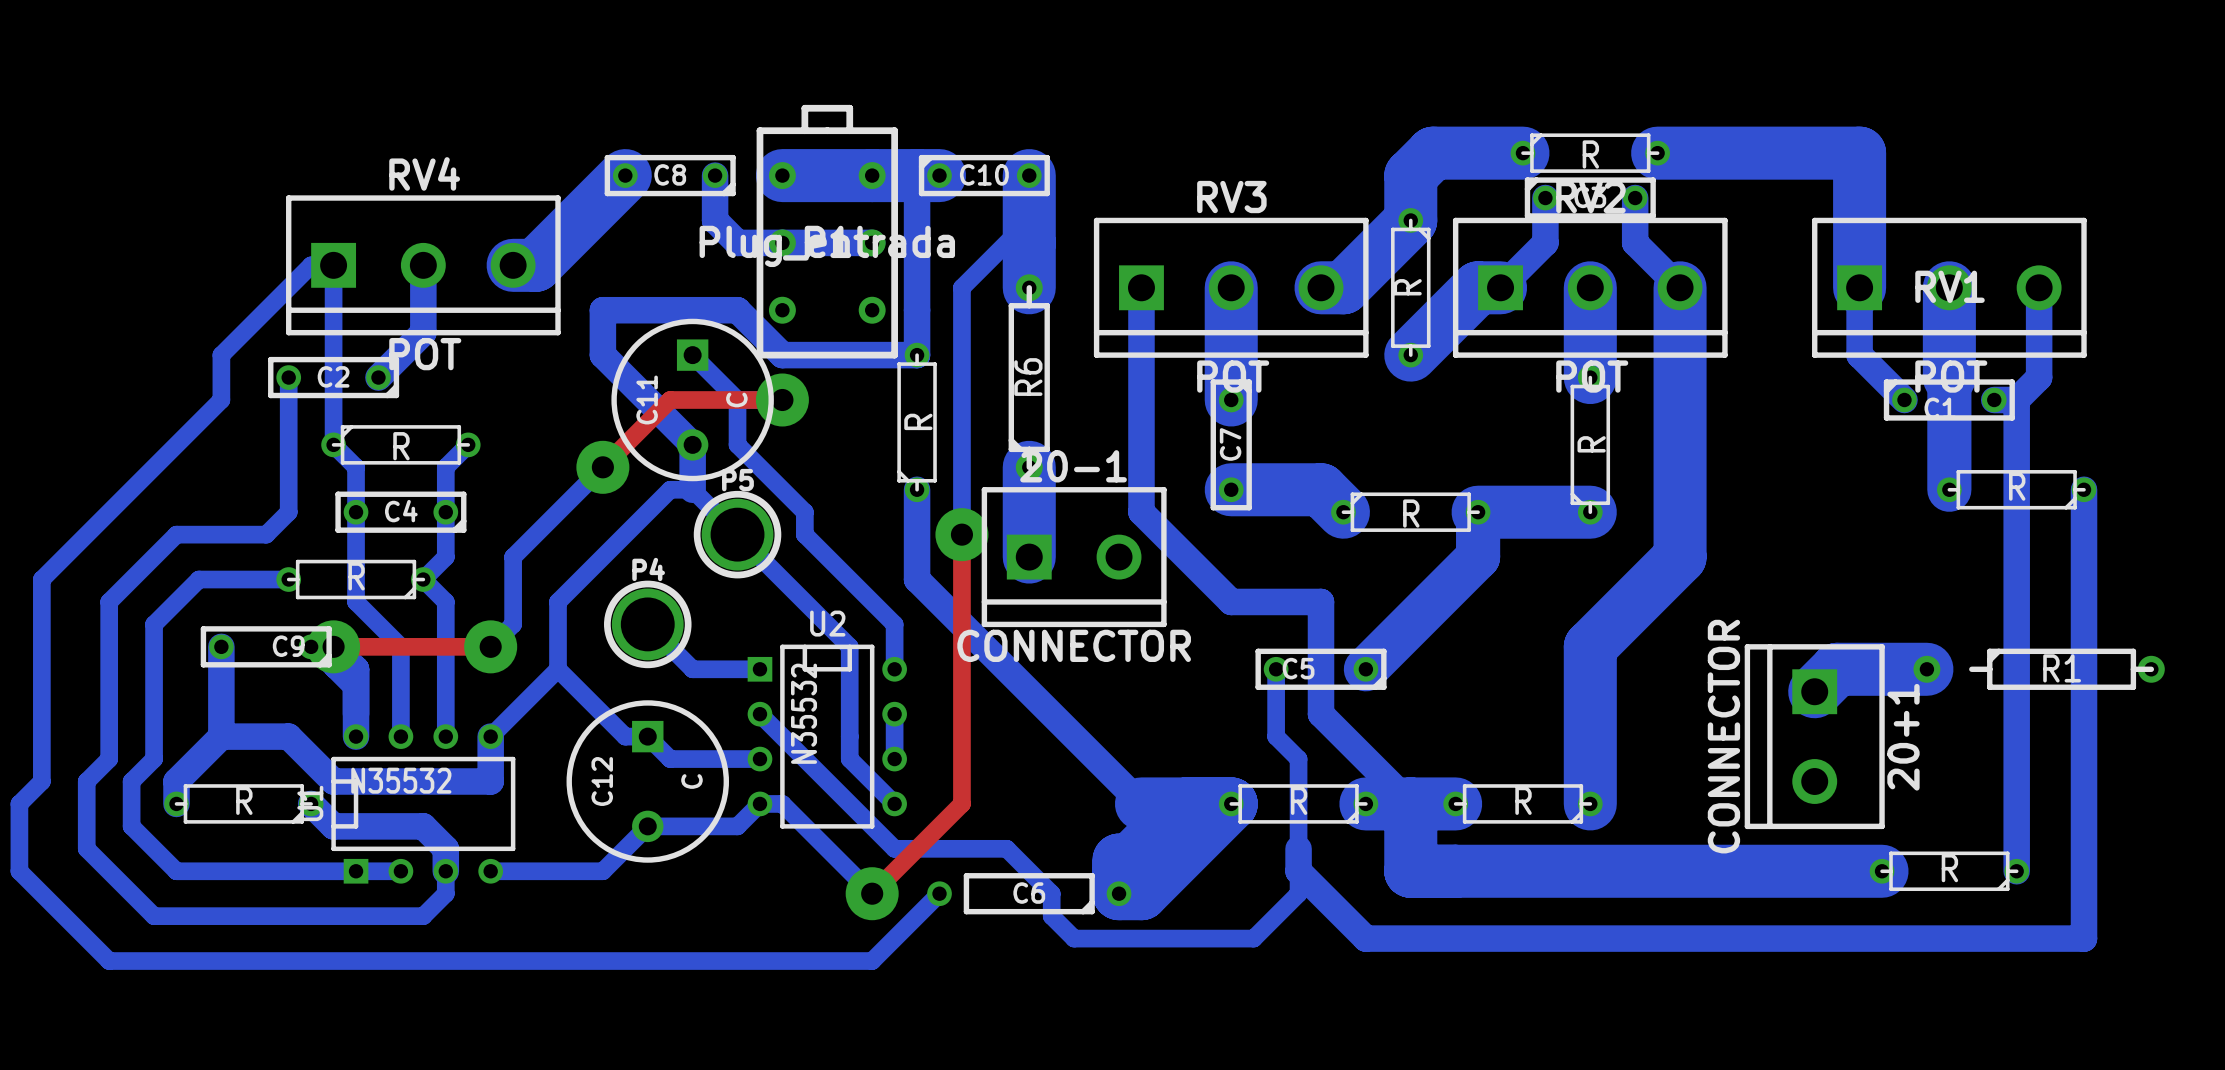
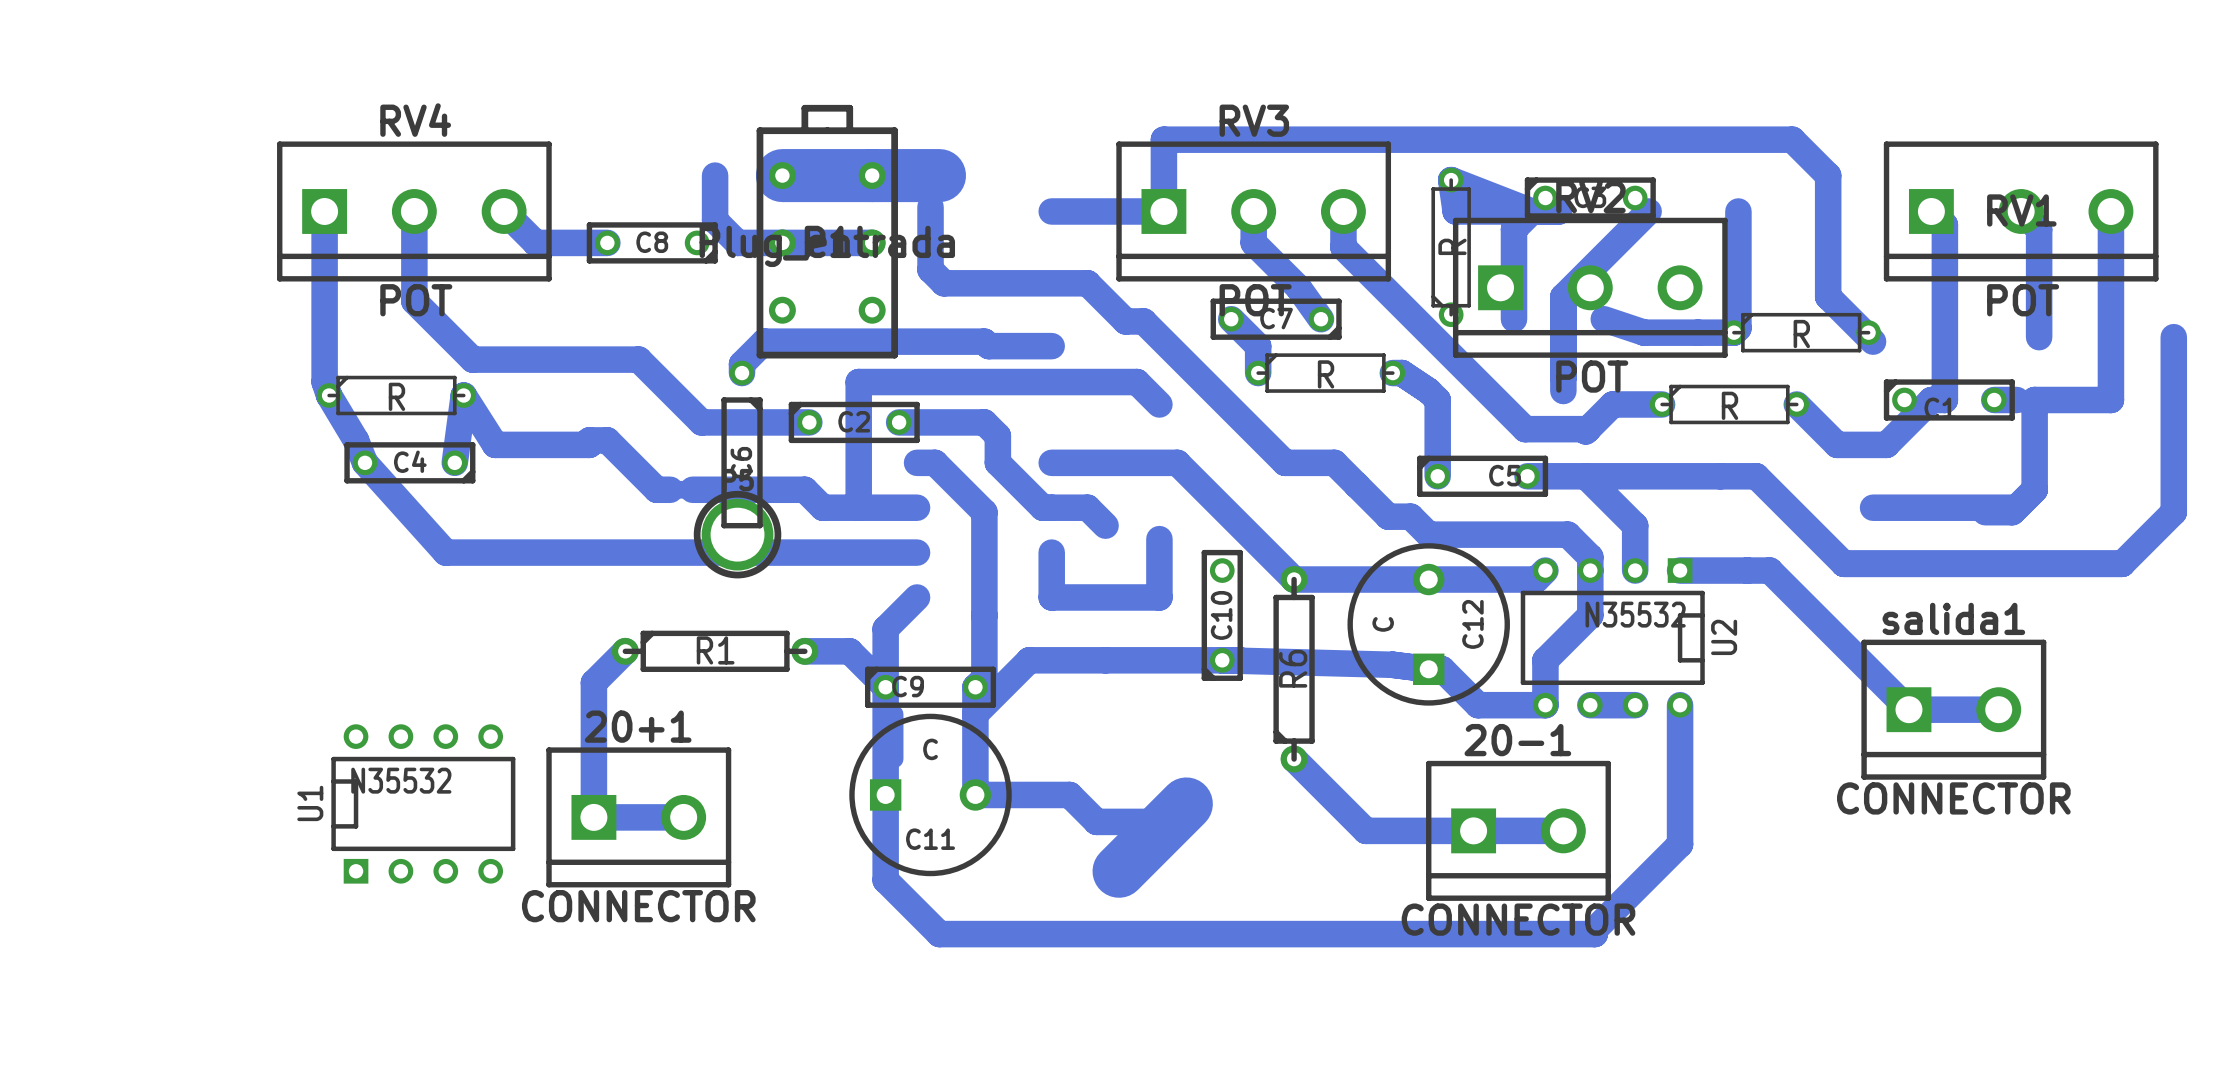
bottom track: (1522, 153) (1433, 153) (1410, 175) (1410, 220) (1343, 287) (1321, 287) -> none
part: R (1590, 153) -> none
bottom track: (1657, 153) (1859, 153) (1859, 355) (1904, 400) -> none
bottom track: (625, 175) (535, 265) (513, 265) -> none
C8 position: (670, 175) -> (652, 242)
bottom track: (917, 175) (917, 355) (782, 355) (737, 310) (602, 310) (602, 355) (692, 444) (692, 489) (849, 646) (849, 759) (894, 803) -> none
C10 rotation: 0° (984, 175) -> 90° counterclockwise (1222, 615)
C10 position: (984, 175) -> (1222, 615)
bottom track: (1029, 175) (1029, 287) -> none
bottom track: (1545, 198) (1545, 242) (1500, 287) (1478, 287) (1410, 355) -> none
bottom track: (1635, 198) (1635, 242) (1680, 287) (1680, 557) (1590, 646) (1590, 803) -> none
bottom track: none -> (930, 207) (930, 269) (943, 283) (1087, 283) (1125, 321) (1143, 321) (1285, 462) (1334, 462) (1388, 516) (1410, 516) (1428, 534) (1567, 534) (1590, 557) (1590, 615) (1545, 660) (1545, 705) (1478, 705) (1442, 669) (1392, 664) (1222, 660)
bottom track: none -> (324, 211) (324, 382) (329, 395) (356, 440) (365, 462) (445, 552) (917, 552)
bottom track: none -> (414, 211) (414, 301) (472, 359) (638, 359) (701, 422) (809, 422)
bottom track: none -> (504, 211) (535, 242) (607, 242)
bottom track: none -> (1051, 211) (1163, 211) (1163, 139) (1792, 139) (1828, 175) (1828, 296) (1873, 341)
bottom track: none -> (1253, 211) (1253, 242) (1298, 287) (1321, 319)
bottom track: none -> (1343, 211) (1343, 247) (1525, 429) (1588, 429)
bottom track: none -> (1558, 211) (1455, 211) (1451, 180) (1531, 211) (1514, 229) (1514, 319)
bottom track: none -> (1648, 211) (1563, 296) (1563, 391)
bottom track: none -> (1738, 211) (1738, 328) (1733, 332) (1644, 332) (1603, 319)
bottom track: none -> (1931, 211) (1944, 224) (1944, 400) (1931, 400) (1886, 444) (1837, 444) (1796, 404)
bottom track: none -> (2021, 211) (2039, 229) (2039, 287)
bottom track: none -> (2110, 211) (2110, 400) (2034, 400) (2034, 489) (2012, 512) (1985, 512)
bottom track: (1029, 242) (1029, 220) (961, 287) (961, 534) -> none
bottom track: (423, 265) (423, 332) (378, 377) -> none
RV4 position: (423, 265) -> (414, 211)
bottom track: (1141, 287) (1141, 512) (1231, 601) (1321, 601) (1321, 714) (1410, 803) (1410, 871) (1882, 871) -> none
bottom track: (1231, 287) (1231, 400) -> none
RV3 position: (1231, 287) -> (1253, 211)
part rotation: 0° (1410, 287) -> 180° (1451, 247)
bottom track: (1590, 287) (1590, 377) -> none
bottom track: (1949, 287) (1949, 489) -> none
RV1 position: (1949, 287) -> (2021, 211)
bottom track: none -> (1231, 319) (1258, 346) (1258, 373)
part: none -> R (1801, 332)
bottom track: (2039, 337) (2039, 377) (2016, 400) (2016, 871) -> none
bottom track: none -> (2173, 337) (2173, 512) (2122, 563) (1843, 563) (1756, 476) (1527, 476)
bottom track: none -> (1051, 346) (988, 346) (984, 341) (764, 341) (742, 364) (742, 373)
bottom track: (692, 355) (737, 400) -> none
part: none -> R (1325, 373)
bottom track: none -> (1392, 373) (1401, 373) (1428, 391) (1437, 400) (1437, 476)
bottom track: (288, 377) (288, 512) (266, 534) (176, 534) (109, 601) (109, 759) (86, 781) (86, 848) (154, 916) (423, 916) (445, 893) (445, 848) (423, 826) (333, 826) (311, 803) -> none
C2 rotation: 0° (333, 377) -> 180° (854, 422)
C2 position: (333, 377) -> (854, 422)
R6 position: (1029, 377) -> (1294, 669)
C11 rotation: 0° (692, 400) -> 90° counterclockwise (930, 794)
C11 position: (692, 400) -> (930, 794)
bottom track: (737, 400) (737, 444) (804, 512) (804, 534) (894, 624) (894, 669) -> none
top track: (782, 400) (670, 400) (602, 467) -> none
via: (782, 400) -> none
bottom track: none -> (1159, 404) (1136, 382) (858, 382) (858, 507)
bottom track: none -> (1662, 404) (1612, 404) (1585, 431)
part: none -> R (1729, 404)
bottom track: none -> (899, 422) (984, 422) (997, 435) (997, 462) (1042, 507) (1087, 507) (1105, 525)
part: R (917, 422) -> none
part position: (400, 444) -> (396, 395)
bottom track: (468, 444) (445, 467) (445, 557) (423, 579) (445, 601) (445, 736) -> none
C7 rotation: 0° (1231, 444) -> 90° clockwise (1276, 319)
C7 position: (1231, 444) -> (1276, 319)
part: R (1590, 444) -> none
bottom track: none -> (917, 462) (935, 462) (984, 512) (984, 678) (975, 687) (975, 794) (1069, 794) (1096, 821) (1186, 821)
bottom track: none -> (1051, 462) (1177, 462) (1294, 579) (1536, 579) (1545, 570)
bottom track: (602, 467) (513, 557) (513, 624) (490, 646) -> none
via: (602, 467) -> none
bottom track: (1029, 467) (1029, 557) -> none
bottom track: none -> (1585, 476) (1635, 525) (1635, 570)
bottom track: (670, 489) (558, 601) (558, 669) -> (670, 489) (656, 489) (607, 440) (589, 440) (589, 444) (495, 444) (463, 395) (454, 462)
bottom track: none -> (692, 489) (804, 489) (822, 507) (917, 507)
bottom track: (917, 489) (917, 579) (1141, 803) (1231, 803) (1141, 893) (1119, 893) (1119, 860) -> none
bottom track: (1231, 489) (1321, 489) (1343, 512) -> none
part: R (2016, 489) -> none
bottom track: (2084, 489) (2084, 938) (1365, 938) (1298, 871) (1298, 848) -> none
bottom track: none -> (1873, 507) (2016, 507)
C4 position: (400, 512) -> (409, 462)
part: R (1410, 512) -> none
bottom track: (1590, 512) (1478, 512) (1478, 557) (1365, 669) -> none
top track: (961, 534) (961, 803) (872, 893) -> none
via: (961, 534) -> none
bottom track: none -> (1159, 539) (1159, 597) (1051, 597) (1051, 552)
20-1 position: (1074, 557) -> (1518, 830)
bottom track: none -> (1680, 570) (1769, 570) (1908, 709) (1998, 709)
bottom track: (288, 579) (198, 579) (154, 624) (154, 759) (131, 781) (131, 826) (176, 871) (400, 871) -> none
part: R (356, 579) -> none
bottom track: none -> (917, 597) (885, 628) (885, 880) (939, 934) (1594, 934) (1594, 929) (1680, 844) (1680, 705)
bottom track: (647, 624) (692, 669) (759, 669) -> none
P4: (647, 624) -> none
bottom track: (221, 646) (221, 736) -> none
C9 rotation: 0° (266, 646) -> 180° (930, 687)
C9 position: (266, 646) -> (930, 687)
bottom track: (311, 646) (356, 691) (356, 736) (356, 669) (333, 646) (333, 669) -> none
top track: (333, 646) (490, 646) -> none
via: (333, 646) -> none
via: (490, 646) -> none
R1 footprint: [1913, 648, 2165, 690] -> [611, 630, 819, 672]
bottom track: none -> (625, 651) (593, 682) (593, 817) (683, 817)
bottom track: none -> (804, 651) (849, 651) (885, 687)
bottom track: none -> (1240, 660) (1029, 660) (975, 714)
bottom track: (558, 669) (490, 736) (490, 781) (333, 781) (288, 736) (221, 736) -> none
bottom track: (558, 669) (625, 736) (647, 736) (670, 759) (759, 759) -> none
bottom track: (1276, 669) (1276, 736) (1298, 759) (1298, 893) (1253, 938) (1074, 938) (1051, 916) (1051, 893) (1006, 848) (894, 848) (759, 714) -> none
C5 rotation: 0° (1321, 669) -> 180° (1482, 476)
C5 position: (1321, 669) -> (1482, 476)
bottom track: (1926, 669) (1837, 669) (1814, 691) -> none
bottom track: none -> (1590, 705) (1635, 705)
salida1: none -> CONNECTOR (1953, 709)
bottom track: (221, 736) (176, 781) (176, 803) -> none
bottom track: (400, 736) (400, 646) (356, 601) (356, 467) (333, 444) (333, 265) (311, 265) (221, 355) (221, 400) (41, 579) (41, 781) (19, 803) (19, 871) (109, 961) (872, 961) (939, 893) -> none
U2 rotation: 0° (827, 736) -> 90° clockwise (1612, 637)
U2 position: (827, 736) -> (1612, 637)
20+1 rotation: 0° (1814, 736) -> 90° counterclockwise (638, 817)
20+1 position: (1814, 736) -> (638, 817)
bottom track: none -> (1294, 759) (1365, 830) (1563, 830)
C12 rotation: 0° (647, 781) -> 180° (1428, 624)
C12 position: (647, 781) -> (1428, 624)
part: R (243, 803) -> none
part: R (1298, 803) -> none
bottom track: (1365, 803) (1455, 803) -> none
part: R (1522, 803) -> none
bottom track: (490, 871) (602, 871) (647, 826) (737, 826) (759, 803) (782, 803) (872, 893) -> none
part: R (1949, 871) -> none
via: (872, 893) -> none
C6 rotation: 0° (1029, 893) -> 90° counterclockwise (742, 462)
C6 position: (1029, 893) -> (742, 462)

